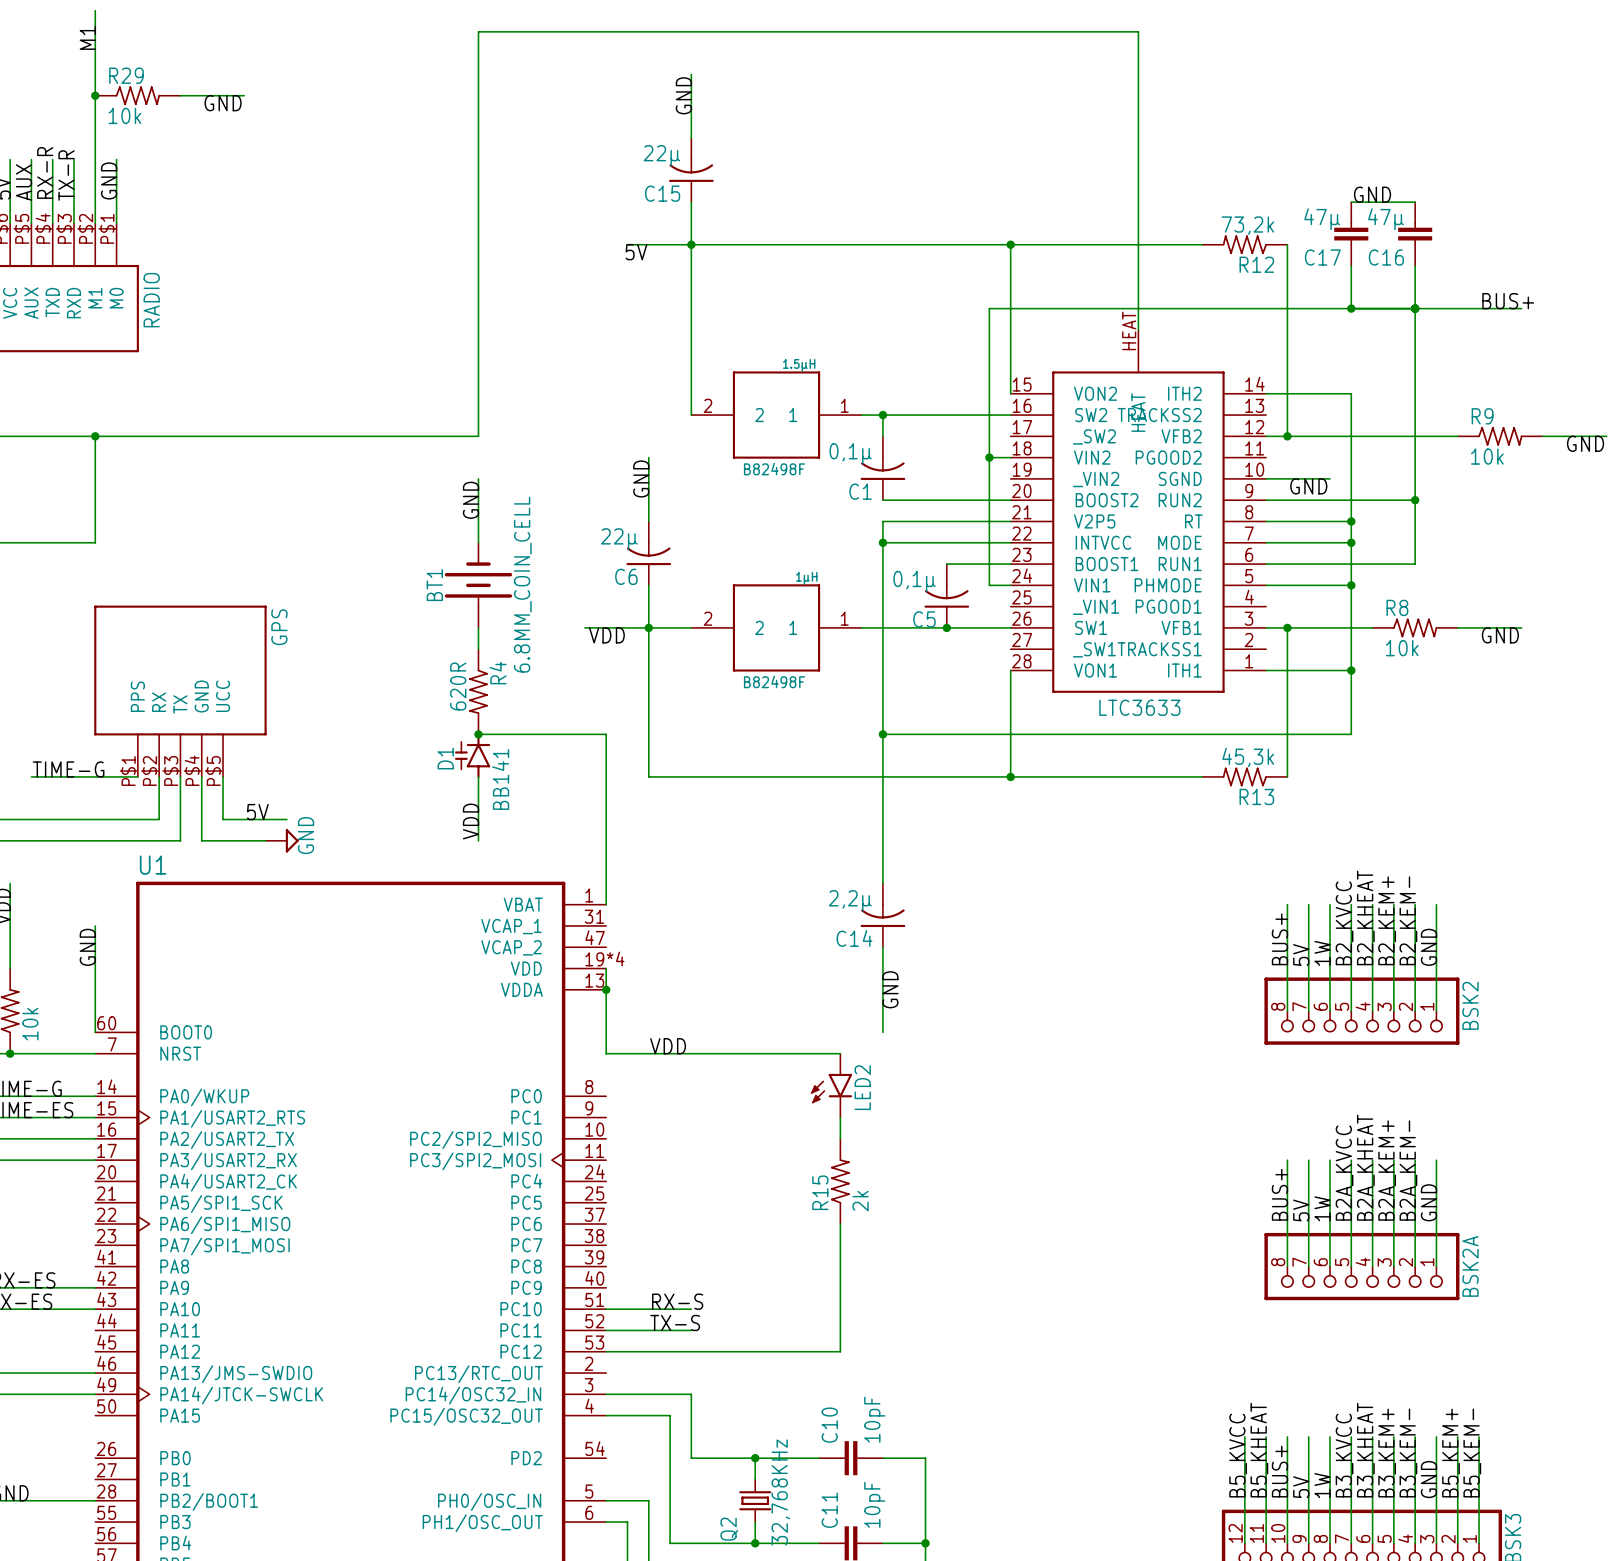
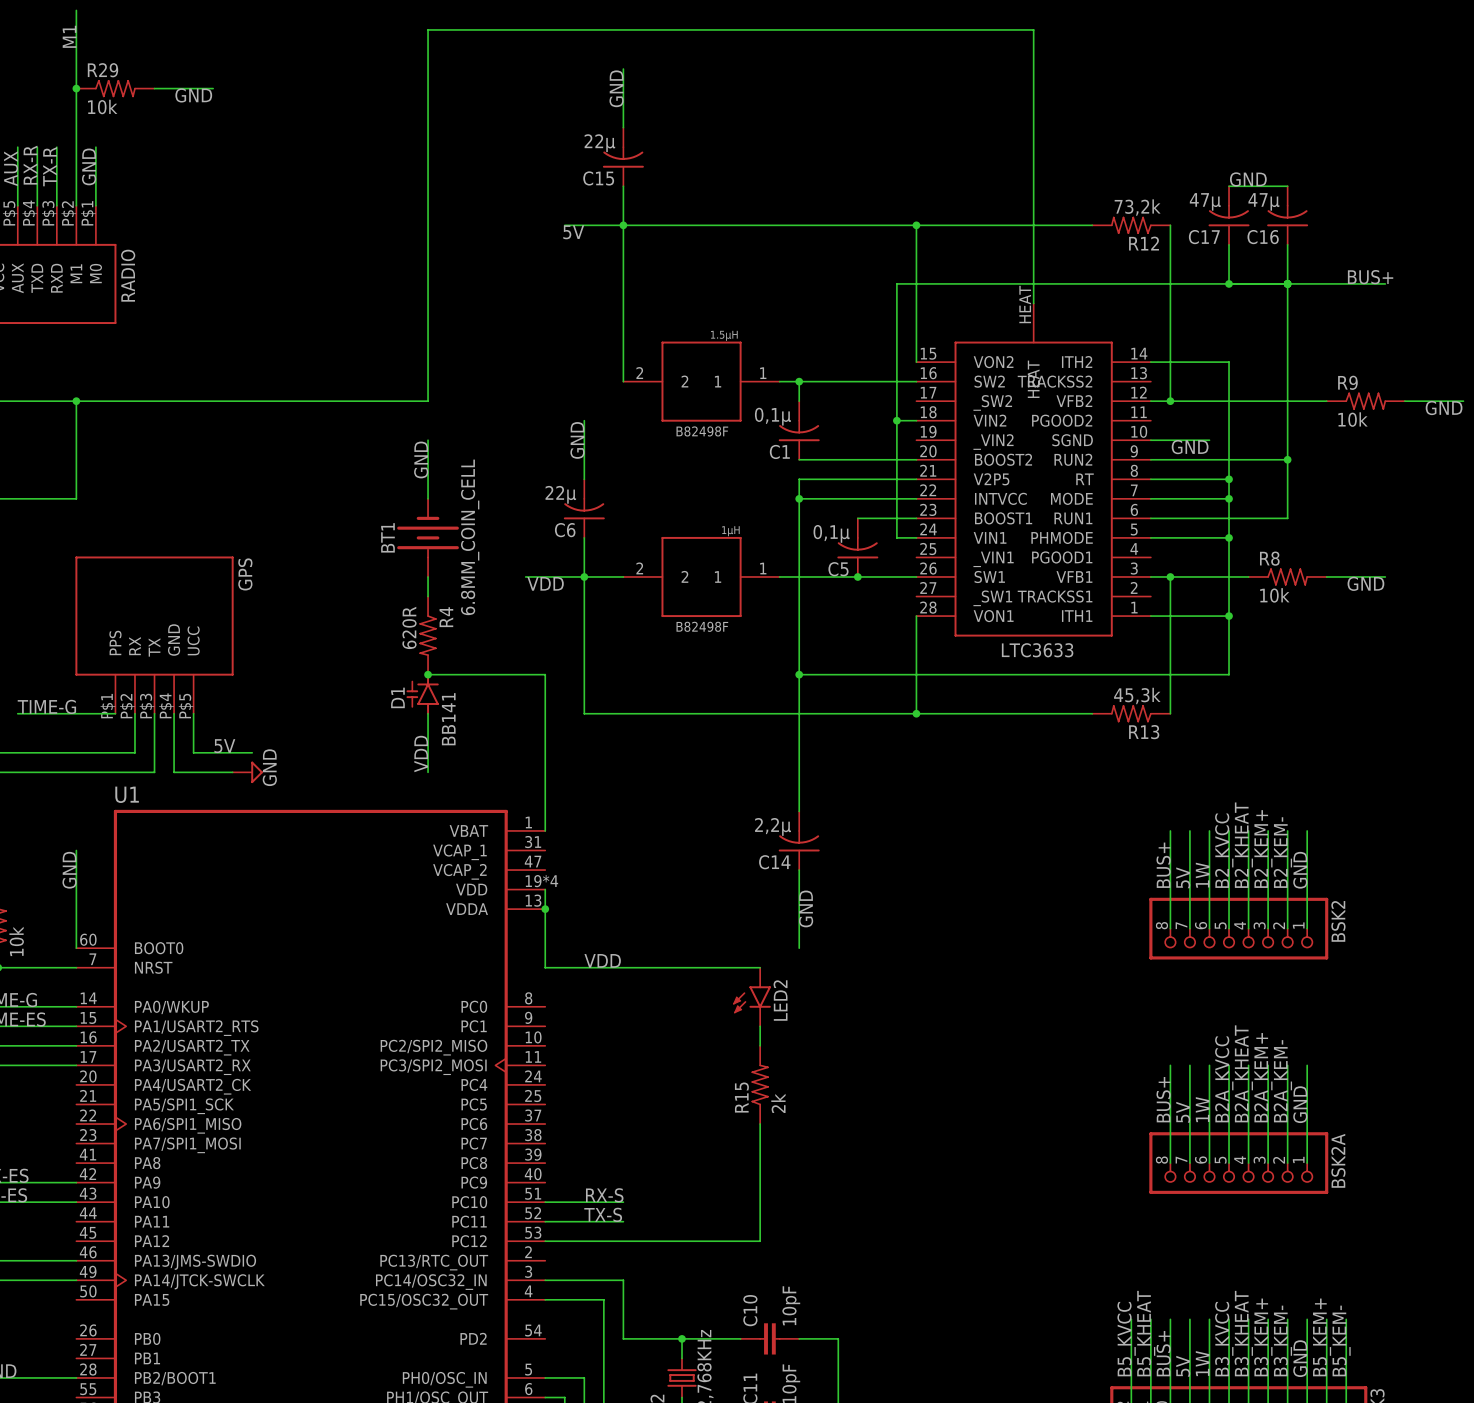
C17 symbol: [1334, 202, 1369, 267] -> [1208, 186, 1250, 245]
C16 symbol: [1398, 202, 1433, 267] -> [1267, 186, 1309, 245]

